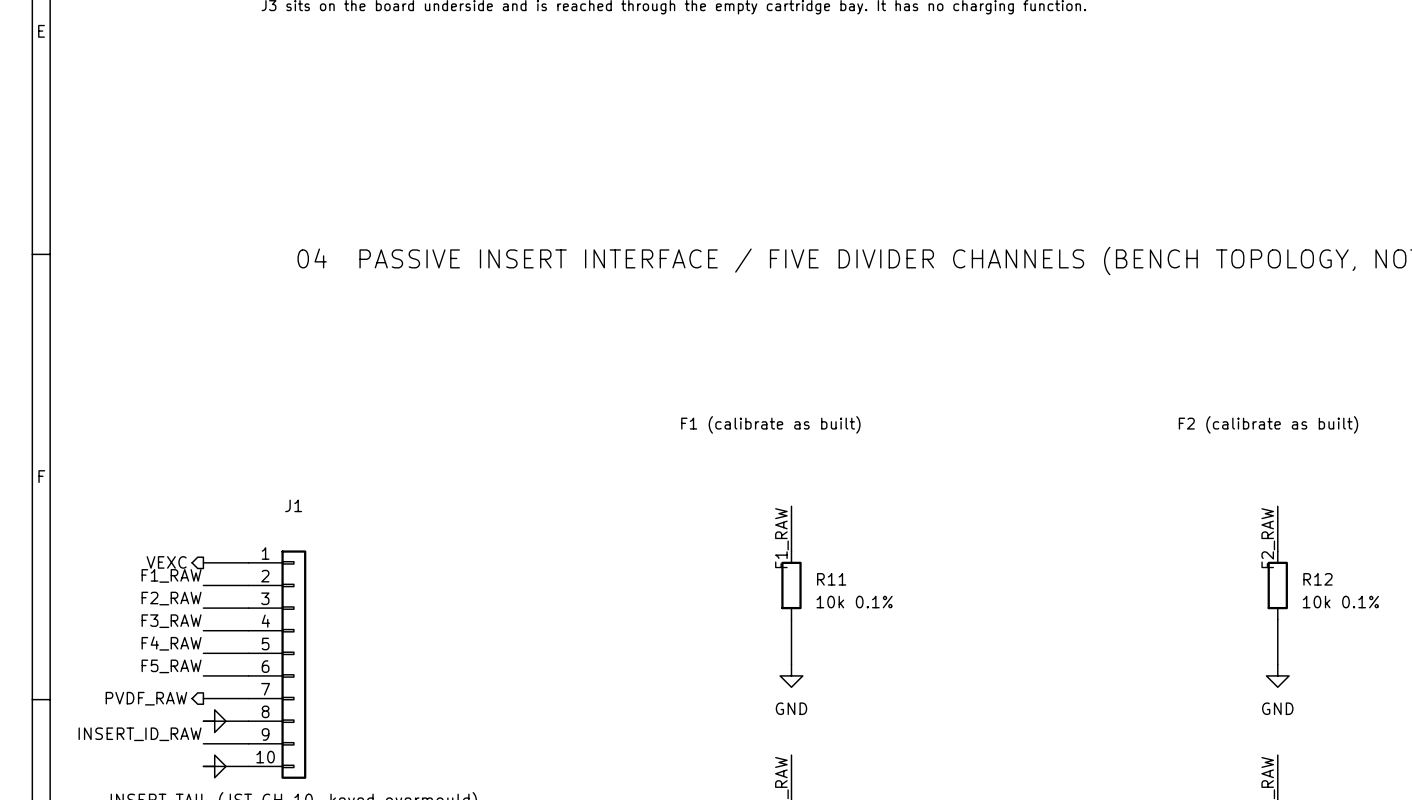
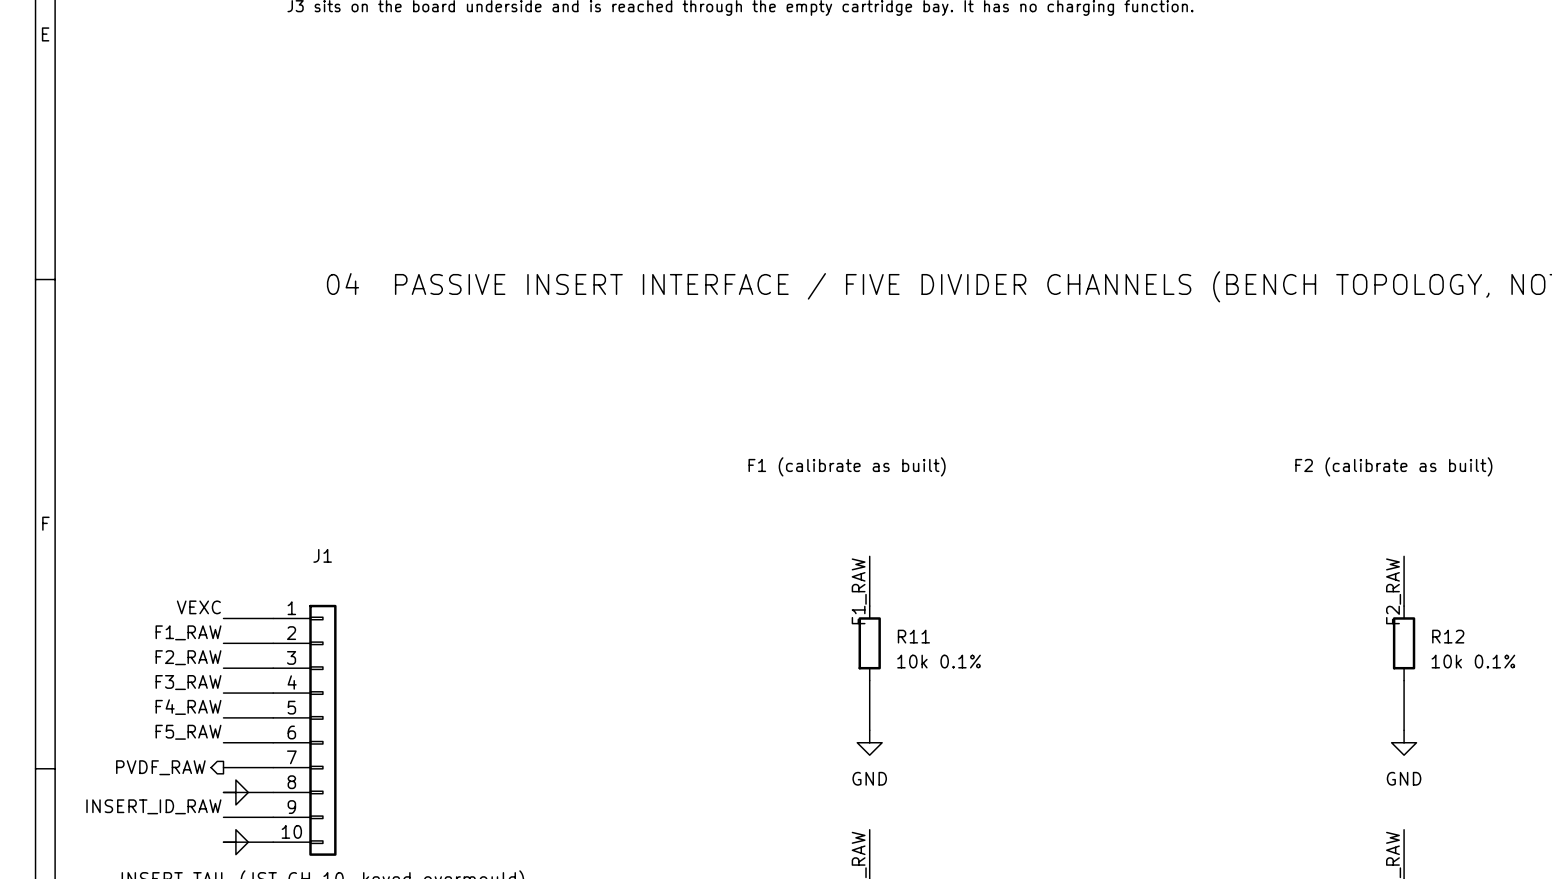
label: none -> VEXC (198, 607)
hierarchical label: VEXC (166, 562) -> none

